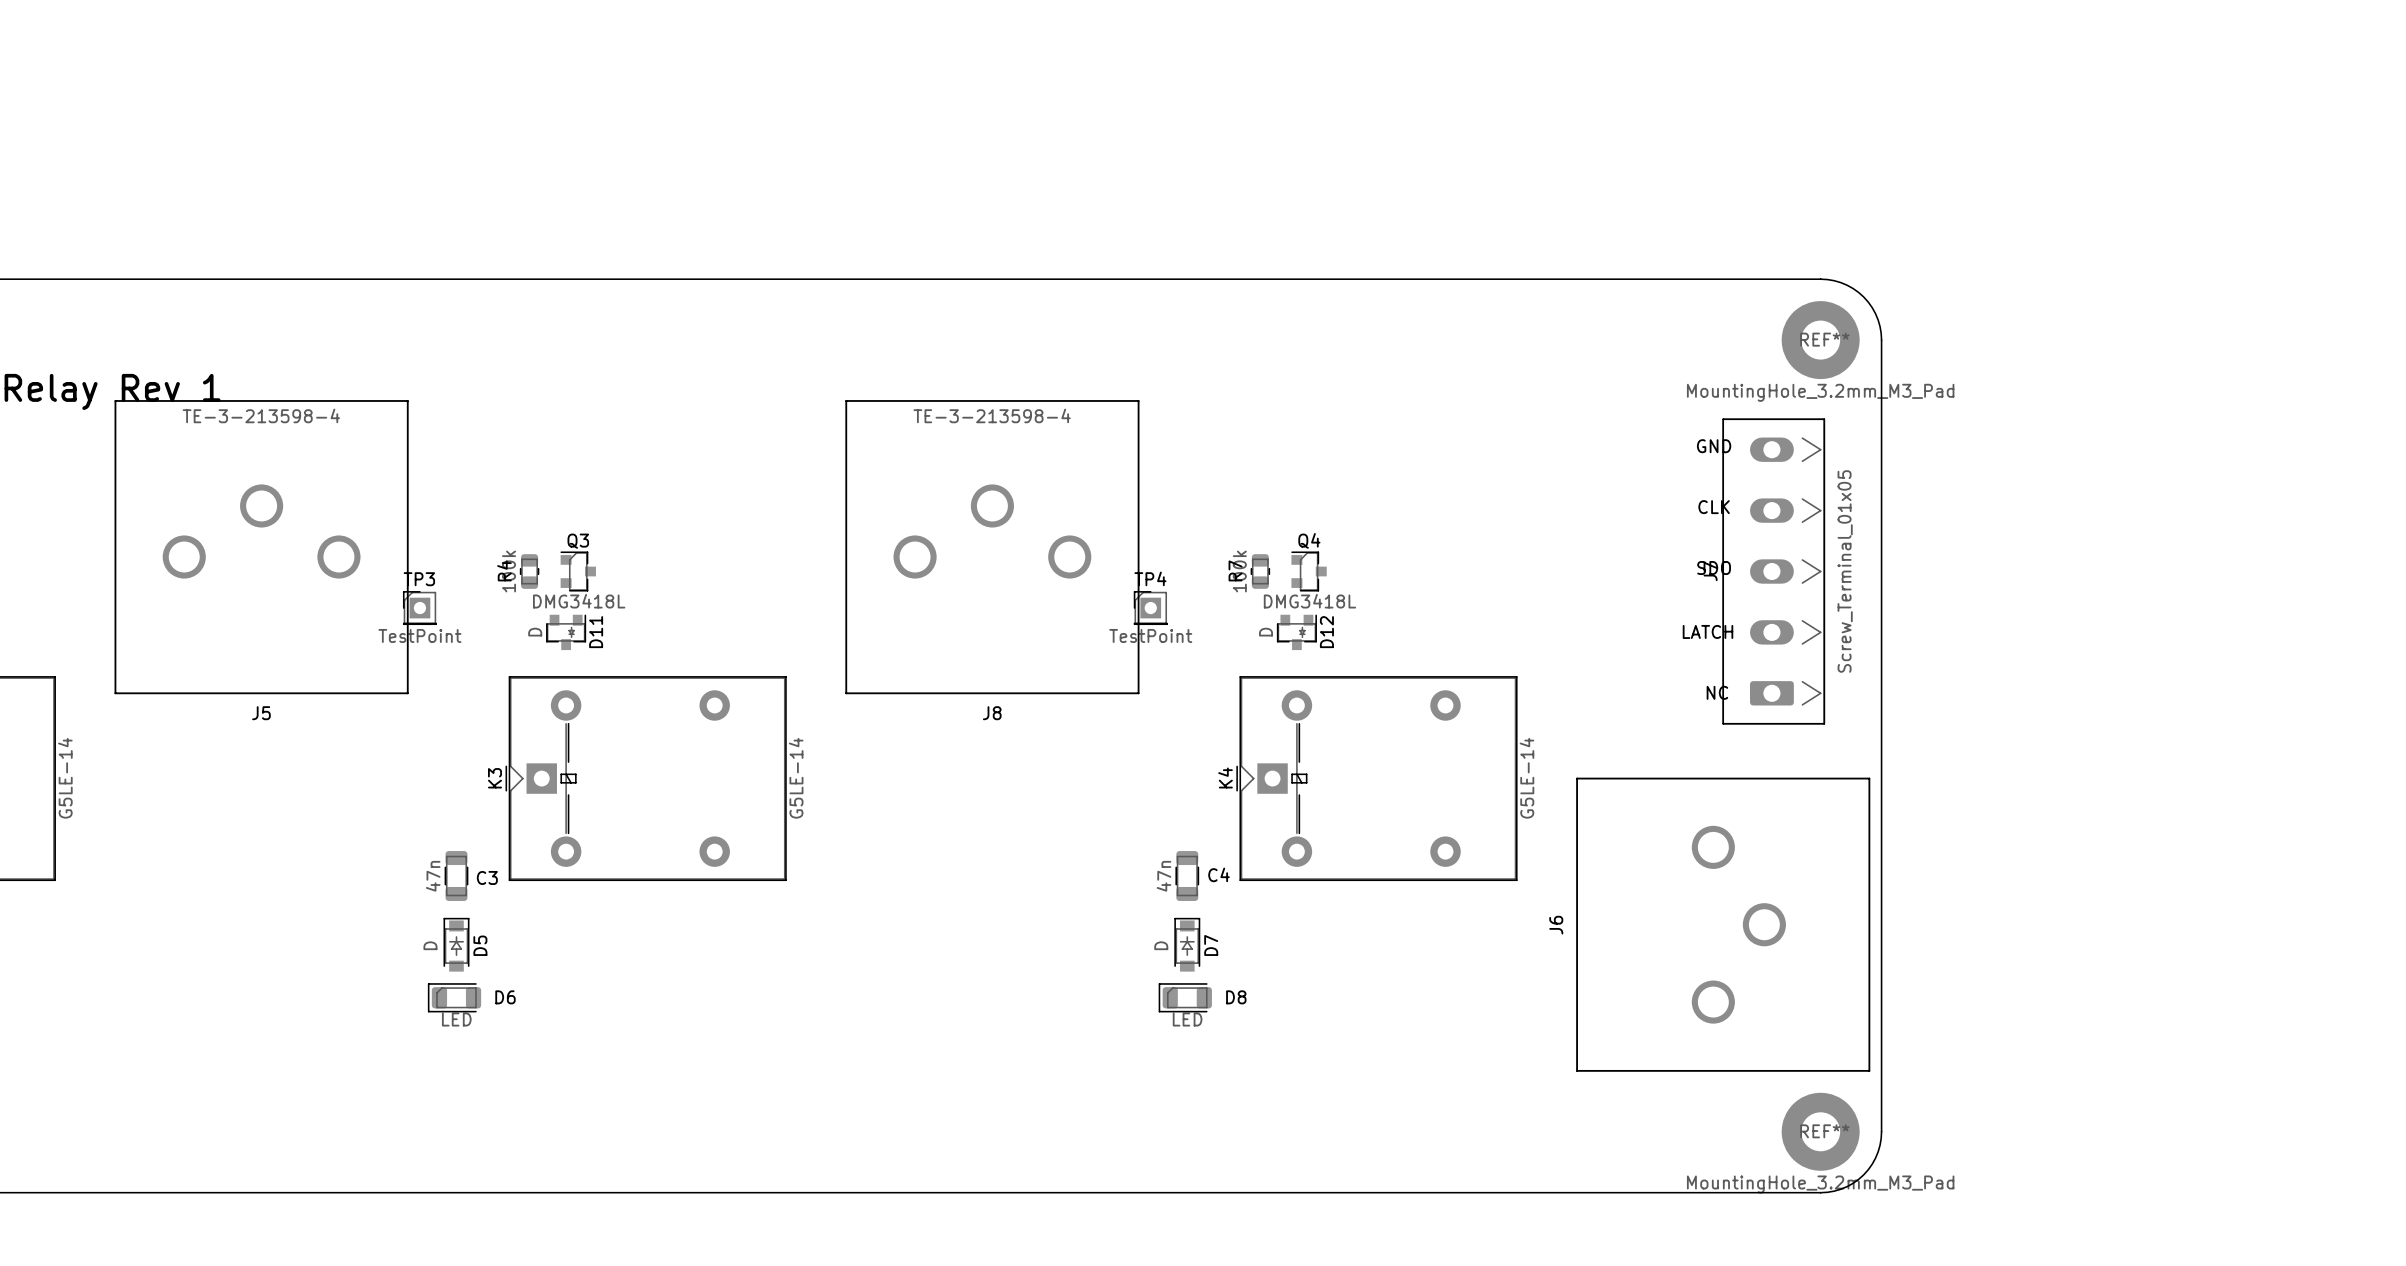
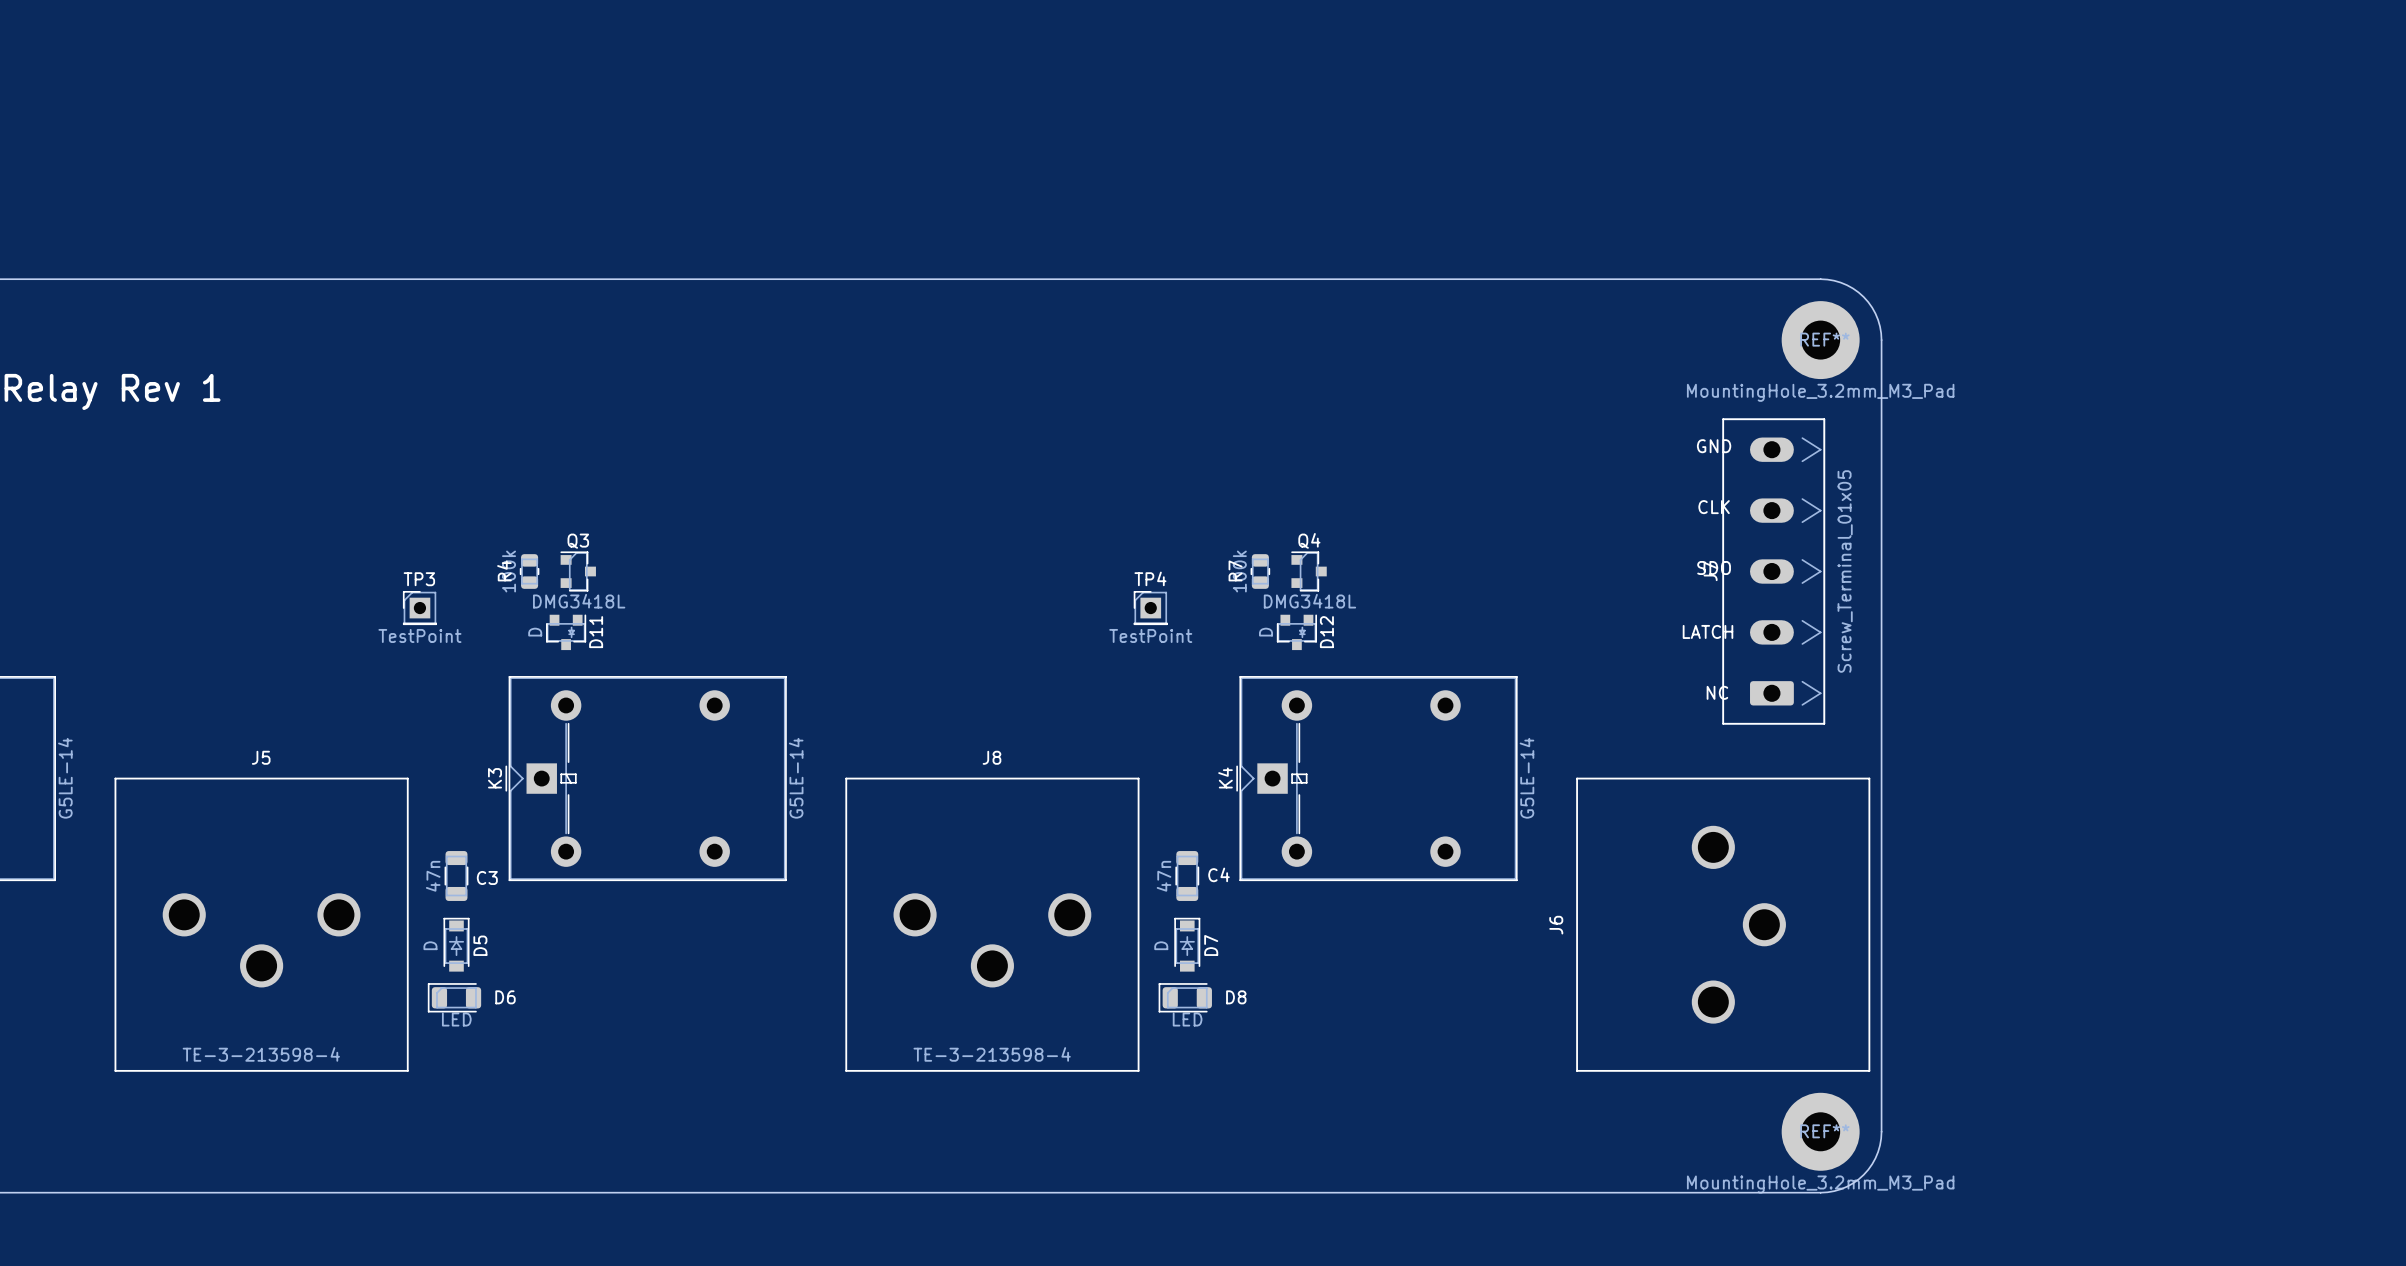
J5 rotation: 0° (261, 547) -> 180° (261, 924)
J5 position: (261, 547) -> (261, 924)
J8 rotation: 0° (992, 547) -> 180° (992, 924)
J8 position: (992, 547) -> (992, 924)

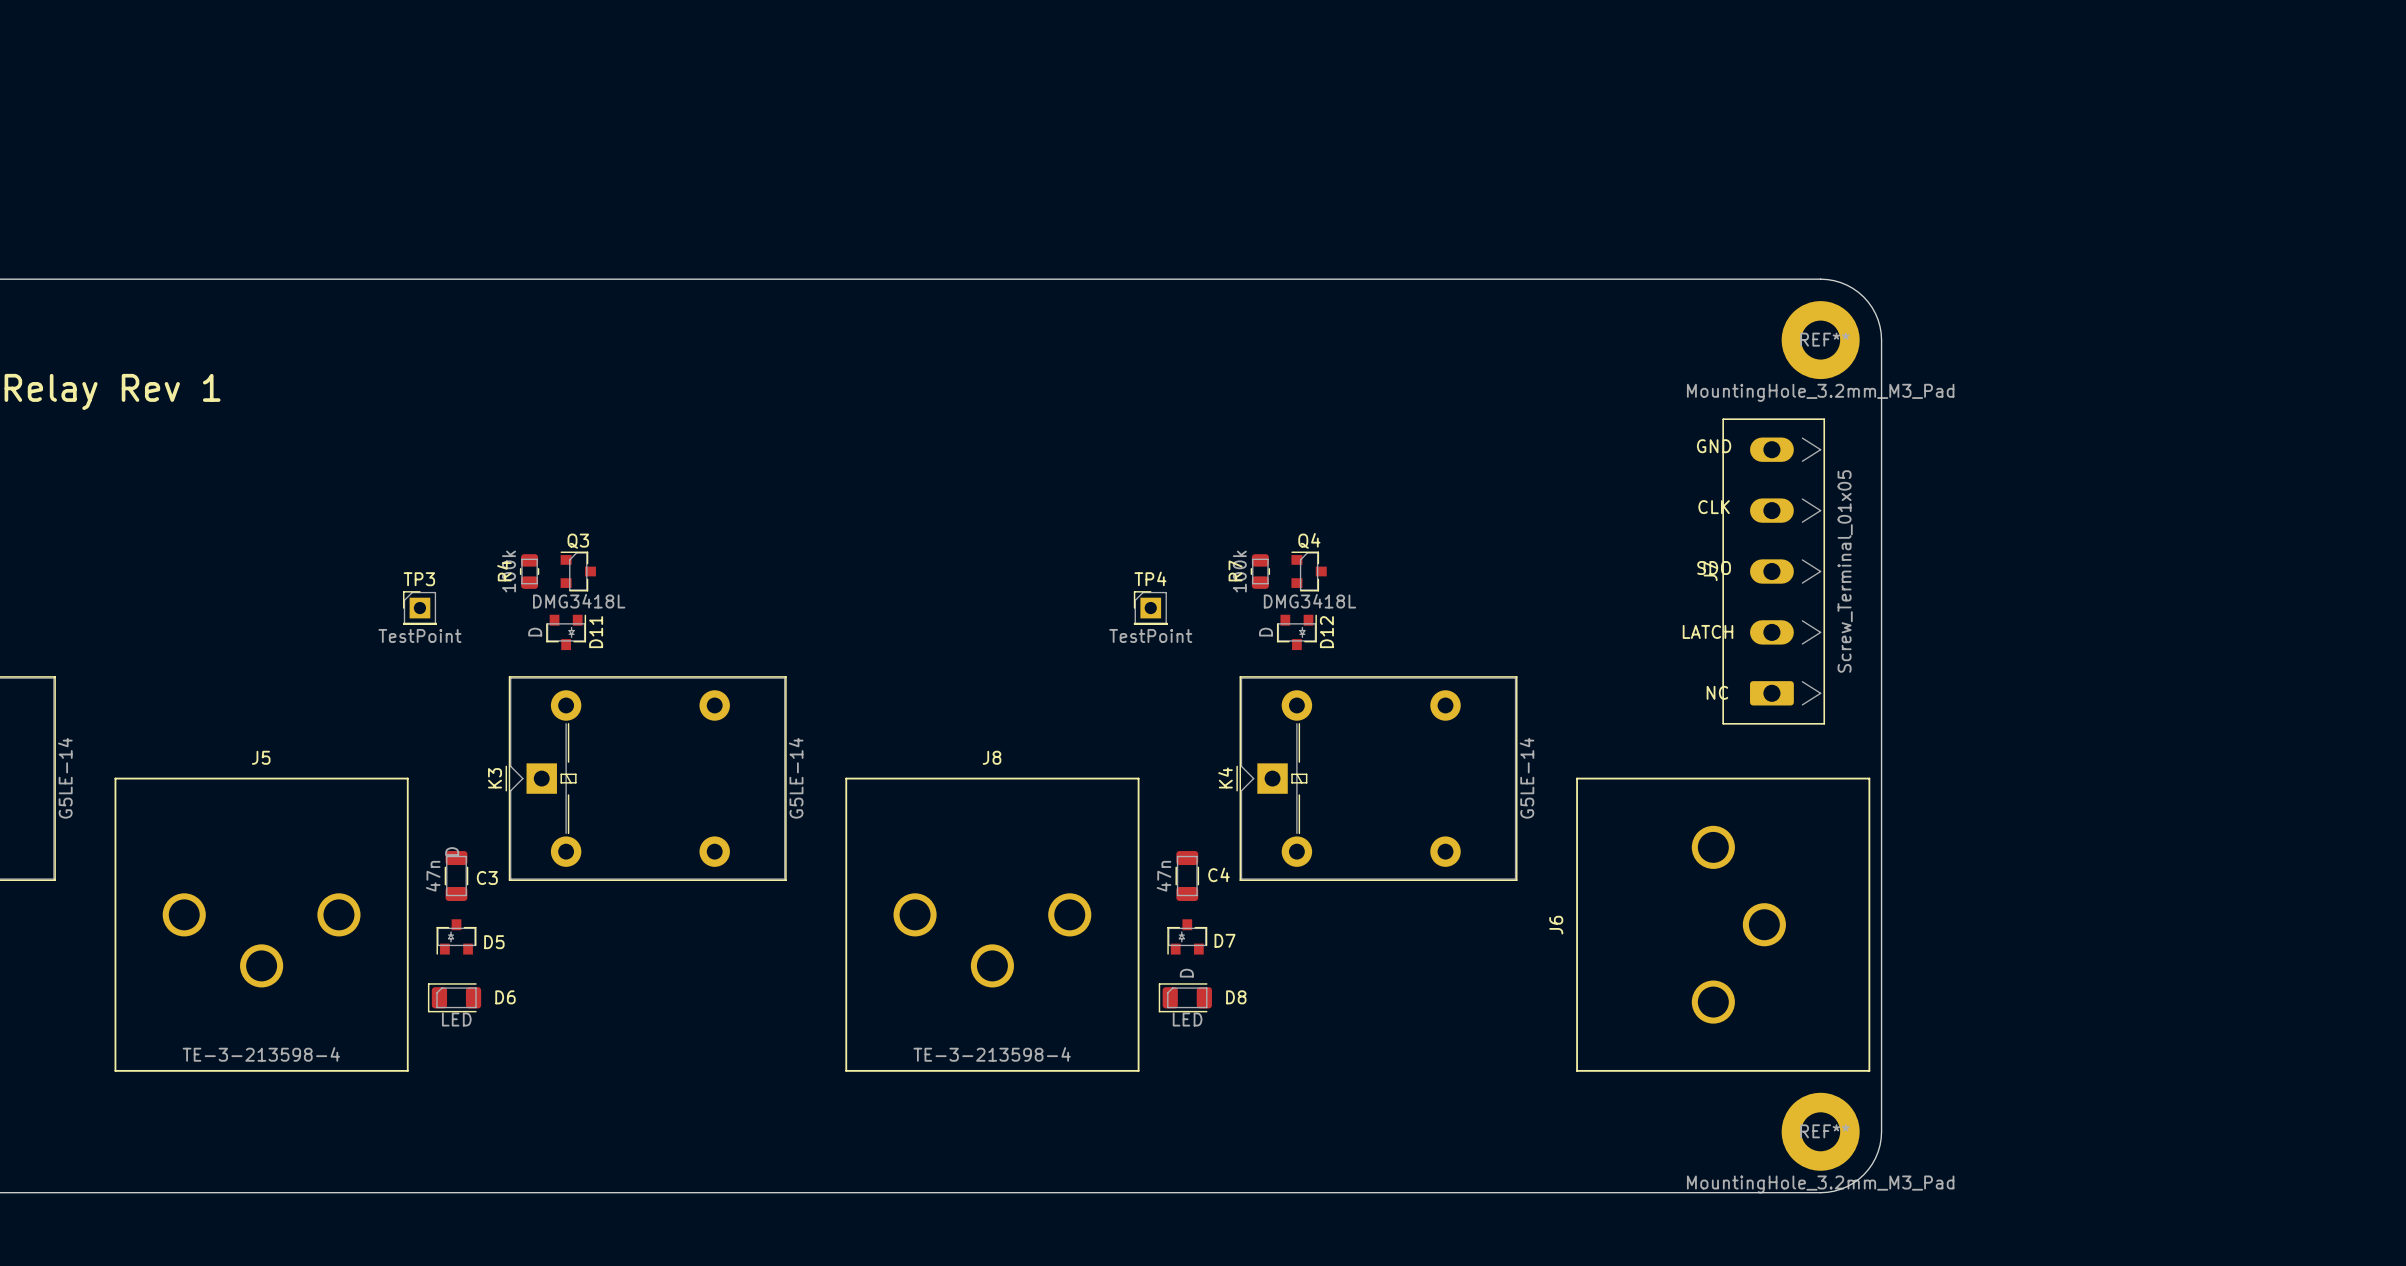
D5 footprint: [443, 917, 470, 972] -> [436, 919, 477, 955]
D7 footprint: [1174, 917, 1201, 972] -> [1167, 919, 1208, 955]
D5 value position: D (430, 945) -> D (452, 851)
D7 value position: D (1161, 945) -> D (1186, 973)

